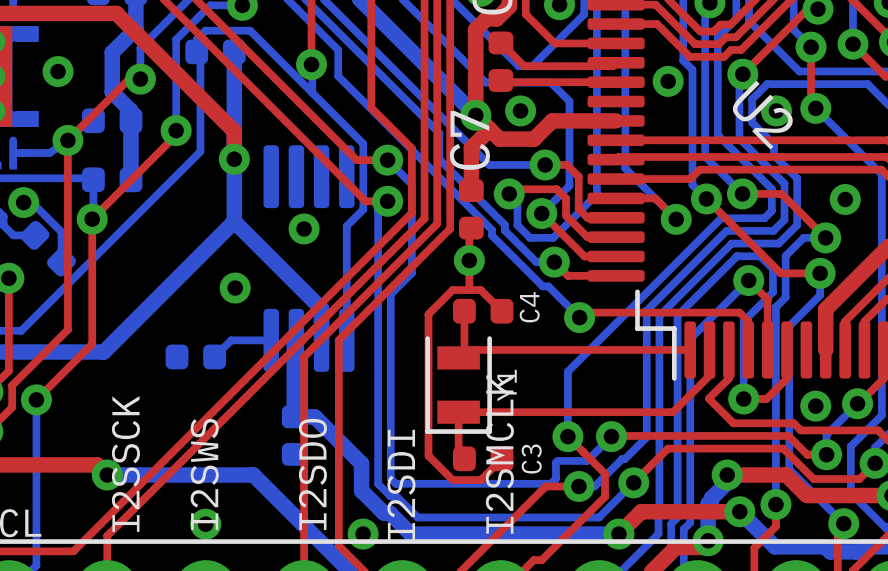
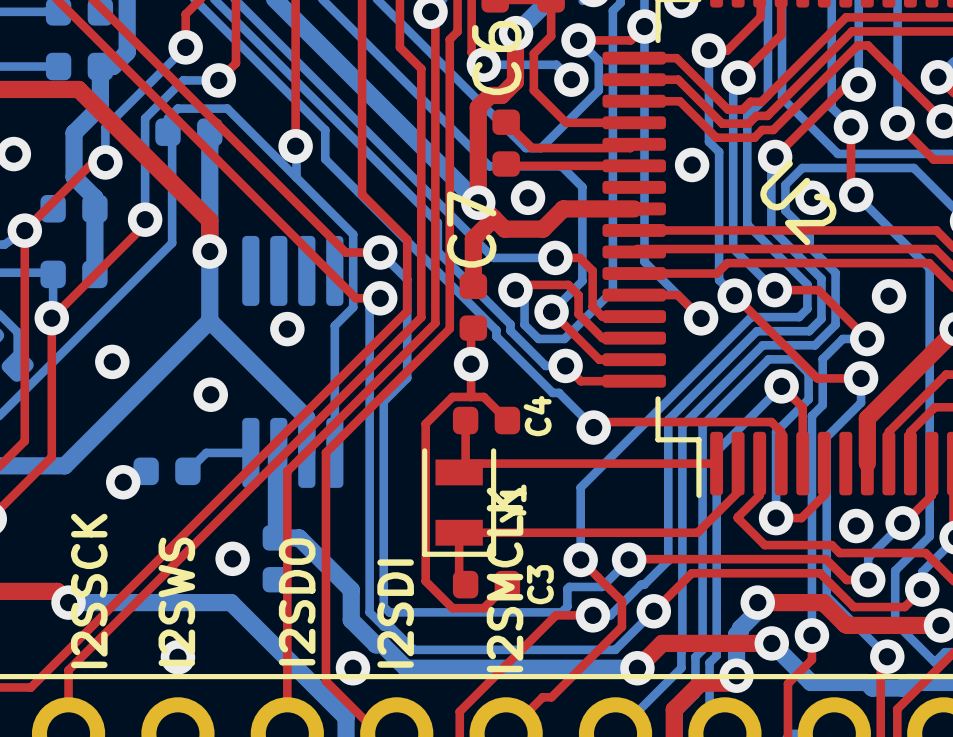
via: none -> (112, 361)
via: none -> (123, 482)
via: none -> (232, 558)

